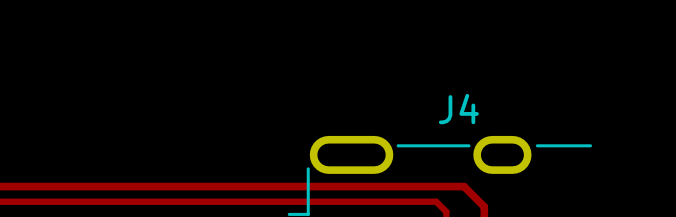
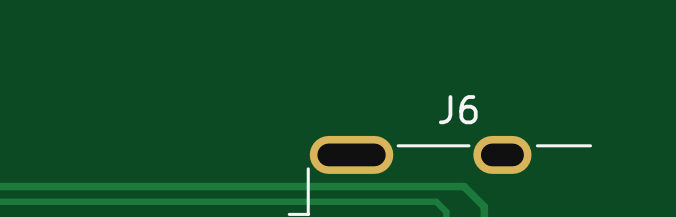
J4 name: J4 (458, 109) -> J6 (458, 109)

